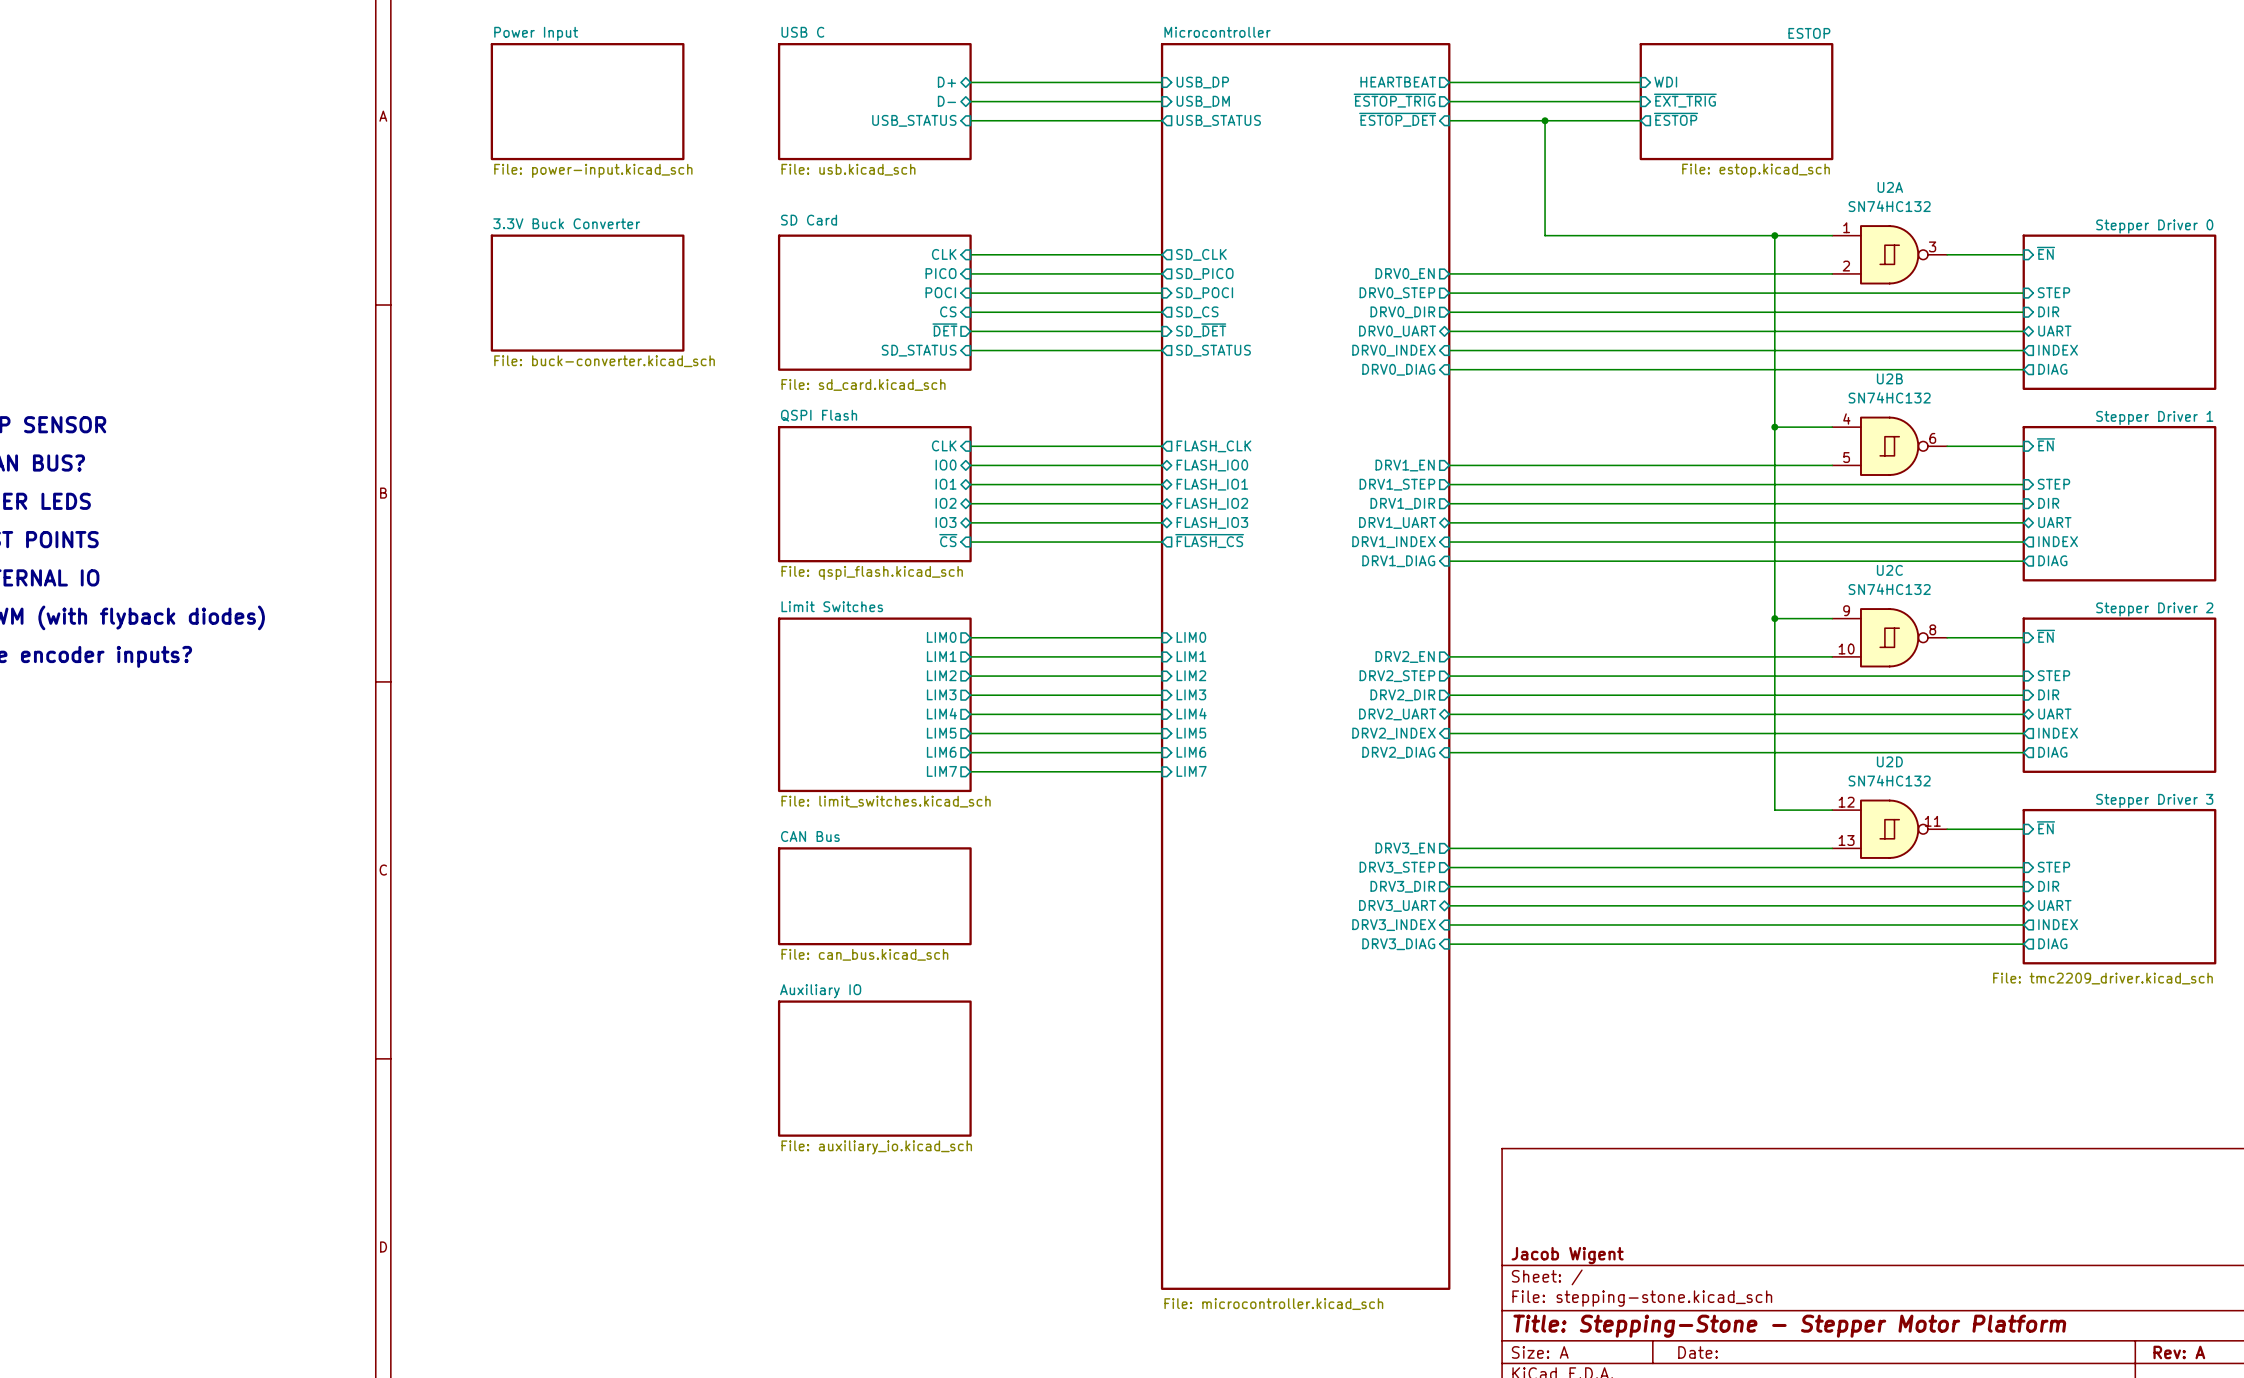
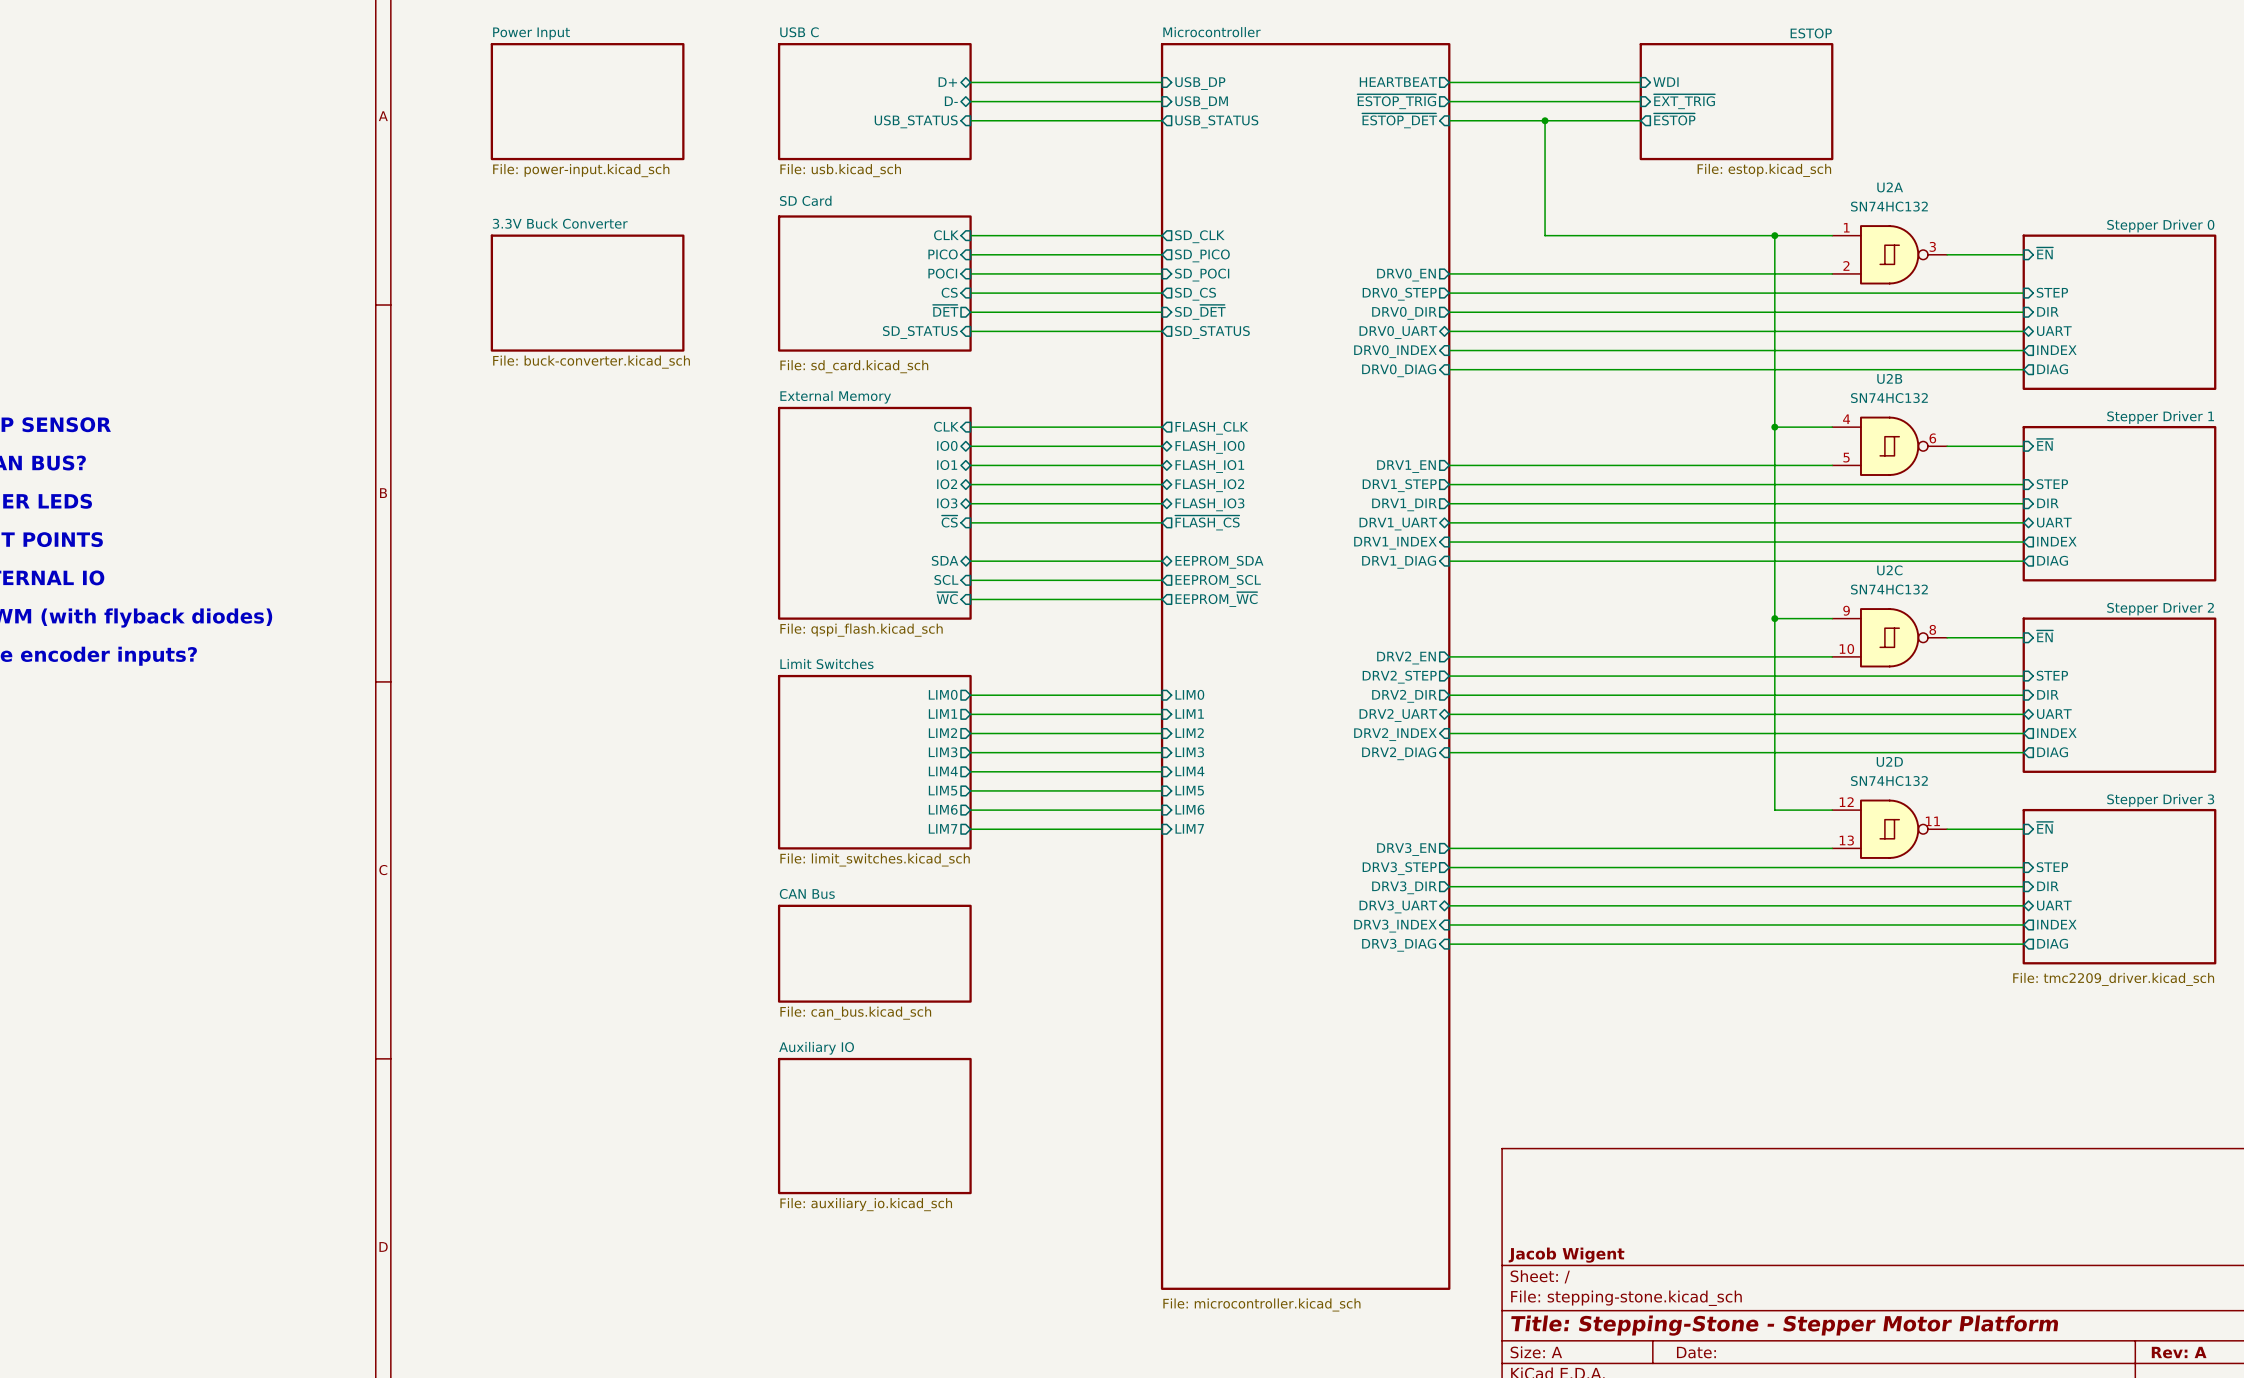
sheet pin: none -> CLK (946, 235)
sheet pin: none -> SD_CLK (1199, 236)
sheet pin: CLK (944, 254) -> PICO (943, 254)
sheet pin: SD_CLK (1201, 254) -> SD_PICO (1202, 255)
sheet pin: PICO (941, 273) -> POCI (942, 273)
sheet pin shape: output (1204, 274) -> input (1202, 275)
sheet pin: SD_PICO (1204, 274) -> SD_POCI (1202, 275)
sheet pin: POCI (940, 292) -> CS (949, 292)
sheet pin shape: input (1204, 293) -> output (1195, 294)
sheet pin: SD_POCI (1204, 293) -> SD_CS (1195, 294)
sheet SD Card position: (874, 302) -> (874, 283)
sheet pin shape: input (948, 311) -> output (945, 310)
sheet pin: CS (948, 311) -> ~{DET} (945, 310)
sheet pin shape: output (1197, 312) -> input (1200, 312)
sheet pin: SD_CS (1197, 312) -> SD_~{DET} (1200, 312)
sheet pin shape: output (944, 329) -> input (920, 332)
sheet pin: ~{DET} (944, 329) -> SD_STATUS (920, 332)
sheet pin shape: input (1201, 330) -> output (1212, 332)
sheet pin: SD_~{DET} (1201, 330) -> SD_STATUS (1212, 332)
sheet pin: SD_STATUS (919, 350) -> none
wire: (970, 350) (1162, 350) -> (970, 235) (1162, 235)
sheet pin: SD_STATUS (1213, 350) -> none
sheet pin: none -> CLK (946, 426)
sheet pin: none -> FLASH_CLK (1211, 428)
sheet pin shape: input (944, 445) -> bidirectional (947, 445)
sheet pin: CLK (944, 445) -> IO0 (947, 445)
sheet pin shape: output (1213, 446) -> bidirectional (1210, 447)
sheet pin: FLASH_CLK (1213, 446) -> FLASH_IO0 (1210, 447)
sheet pin: IO0 (946, 465) -> IO1 (947, 465)
sheet pin: FLASH_IO0 (1212, 465) -> FLASH_IO1 (1209, 466)
sheet pin: IO1 (946, 484) -> IO2 (947, 484)
sheet pin: FLASH_IO1 (1212, 484) -> FLASH_IO2 (1209, 485)
sheet QSPI Flash: File: qspi_flash.kicad_sch (874, 494) -> none
sheet pin: IO2 (946, 503) -> IO3 (947, 503)
sheet pin: FLASH_IO2 (1212, 503) -> FLASH_IO3 (1209, 504)
sheet External Memory: none -> File: qspi_flash.kicad_sch (874, 513)
sheet pin shape: bidirectional (946, 522) -> input (949, 521)
sheet pin: IO3 (946, 522) -> ~{CS} (949, 521)
sheet pin shape: bidirectional (1212, 522) -> output (1207, 522)
sheet pin: FLASH_IO3 (1212, 522) -> ~{FLASH_CS} (1207, 522)
sheet pin: ~{CS} (948, 540) -> none
sheet pin: ~{FLASH_CS} (1209, 541) -> none
wire: (970, 542) (1162, 542) -> (970, 427) (1162, 427)
sheet pin: none -> SDA (945, 560)
sheet pin: none -> EEPROM_SDA (1219, 562)
sheet pin: none -> SCL (946, 579)
sheet pin: none -> EEPROM_SCL (1218, 581)
sheet pin: none -> ~{WC} (947, 598)
sheet pin: none -> EEPROM_~{WC} (1216, 599)
sheet pin: LIM0 (941, 637) -> none
wire: (970, 637) (1162, 637) -> (970, 561) (1162, 561)
sheet pin: LIM0 (1191, 637) -> none
sheet pin: LIM1 (941, 656) -> none
wire: (970, 656) (1162, 656) -> (970, 580) (1162, 580)
sheet pin: LIM1 (1191, 656) -> none
sheet pin: LIM2 (941, 675) -> none
sheet pin: LIM2 (1191, 675) -> none
wire: (970, 676) (1162, 676) -> (970, 599) (1162, 599)
sheet pin: LIM3 (941, 694) -> LIM0 (943, 694)
sheet pin: LIM3 (1191, 694) -> LIM0 (1189, 694)
sheet Limit Switches position: (874, 704) -> (874, 762)
sheet pin: LIM4 (941, 713) -> LIM1 (943, 714)
sheet pin: LIM4 (1191, 713) -> LIM1 (1189, 714)
sheet pin: LIM5 (941, 733) -> LIM2 (942, 733)
sheet pin: LIM5 (1191, 733) -> LIM2 (1189, 733)
sheet pin: LIM6 (941, 752) -> LIM3 (943, 752)
sheet pin: LIM6 (1191, 752) -> LIM3 (1189, 752)
sheet pin: LIM7 (941, 771) -> LIM4 (943, 771)
sheet pin: LIM7 (1191, 771) -> LIM4 (1189, 771)
sheet pin: none -> LIM5 (943, 790)
wire: none -> (970, 790) (1162, 790)
sheet pin: none -> LIM5 (1189, 790)
sheet pin: none -> LIM6 (943, 809)
sheet pin: none -> LIM6 (1189, 809)
wire: none -> (970, 810) (1162, 810)
sheet pin: none -> LIM7 (943, 828)
sheet pin: none -> LIM7 (1189, 828)
wire: none -> (970, 829) (1162, 829)
sheet CAN Bus position: (874, 896) -> (874, 953)
sheet Auxiliary IO position: (874, 1068) -> (874, 1126)

